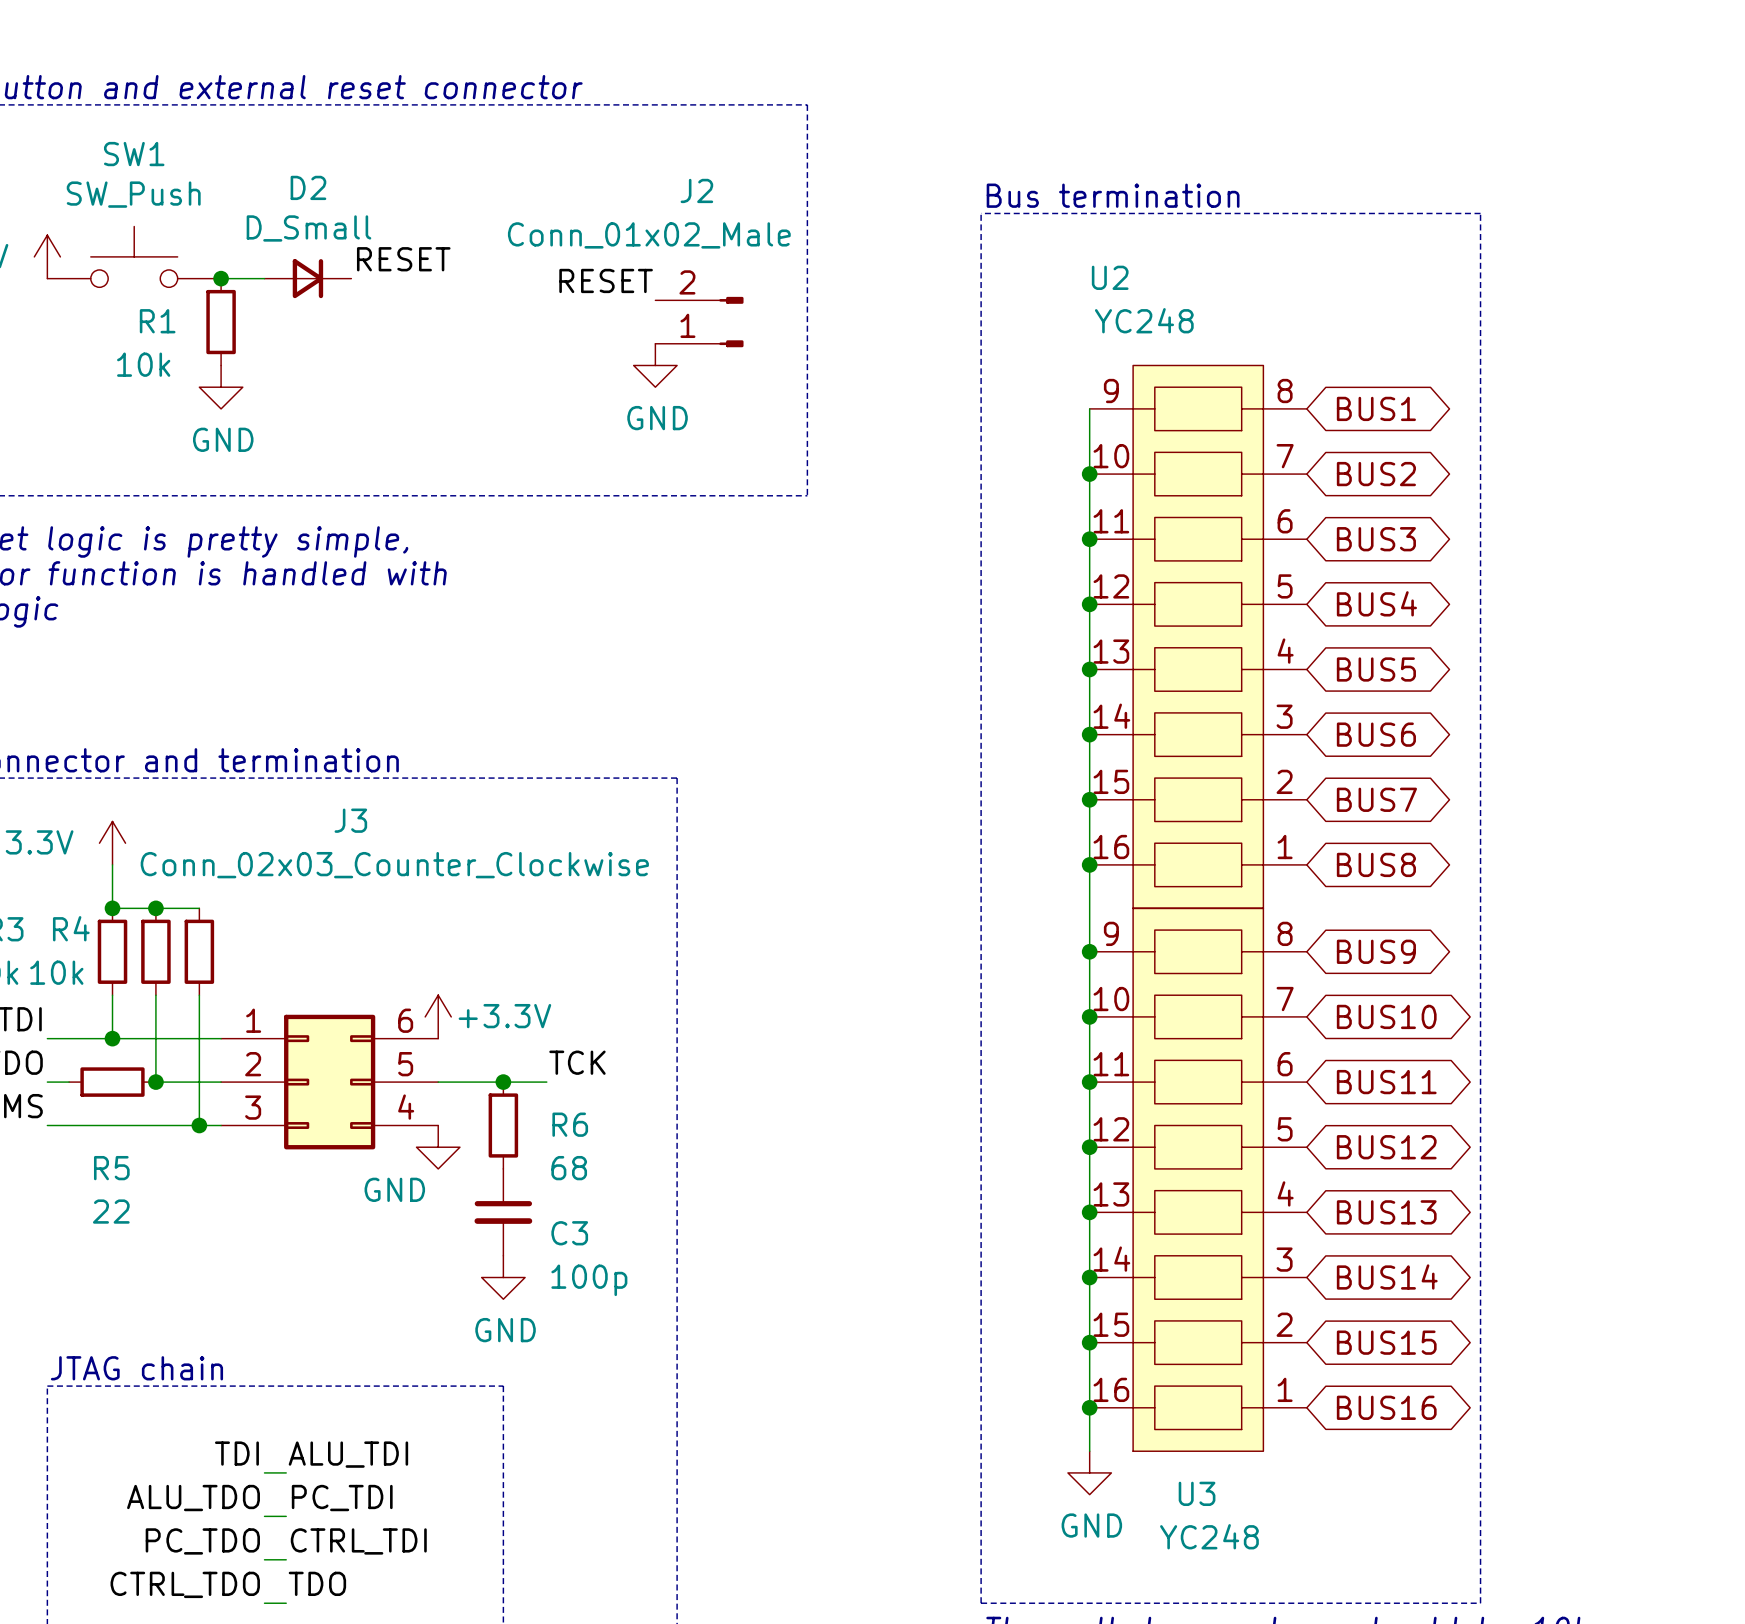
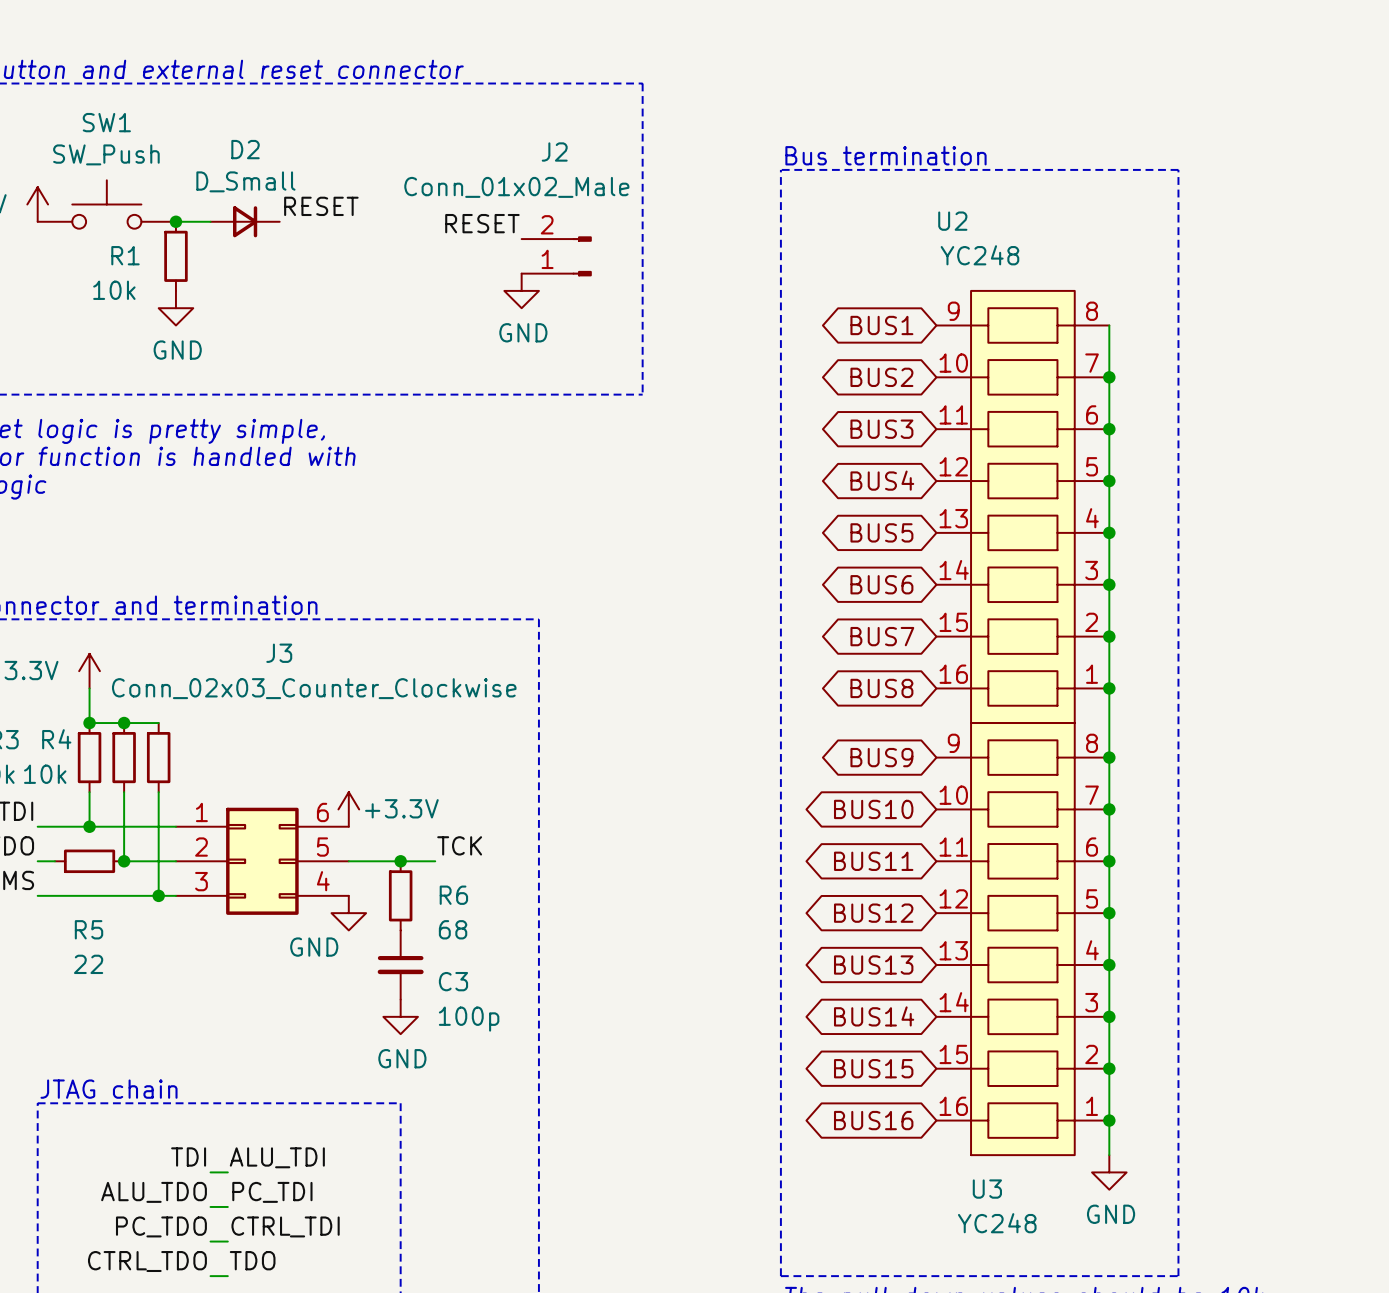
wire: (1089, 408) (1089, 1451) -> (1109, 325) (1109, 1155)
global label rotation: 0° (1376, 408) -> 180° (881, 325)
global label position: BUS1 (1376, 408) -> BUS1 (881, 325)
junction: (1089, 474) -> none
global label rotation: 0° (1376, 474) -> 180° (881, 377)
global label position: BUS2 (1376, 474) -> BUS2 (881, 377)
junction: none -> (1109, 377)
junction: (1089, 539) -> none
global label rotation: 0° (1376, 539) -> 180° (881, 429)
global label position: BUS3 (1376, 539) -> BUS3 (881, 429)
junction: none -> (1109, 429)
global label rotation: 0° (1376, 603) -> 180° (882, 480)
global label position: BUS4 (1376, 603) -> BUS4 (882, 480)
junction: (1089, 604) -> none
junction: none -> (1109, 481)
U2 position: (1198, 636) -> (1022, 506)
junction: (1089, 669) -> none
global label rotation: 0° (1376, 669) -> 180° (881, 532)
global label position: BUS5 (1376, 669) -> BUS5 (881, 532)
junction: none -> (1109, 532)
junction: (1089, 734) -> none
global label rotation: 0° (1376, 734) -> 180° (881, 584)
global label position: BUS6 (1376, 734) -> BUS6 (881, 584)
junction: none -> (1109, 584)
junction: (1089, 799) -> none
global label rotation: 0° (1376, 799) -> 180° (882, 636)
global label position: BUS7 (1376, 799) -> BUS7 (882, 636)
junction: none -> (1109, 636)
junction: (1089, 864) -> none
global label rotation: 0° (1376, 864) -> 180° (881, 688)
global label position: BUS8 (1376, 864) -> BUS8 (881, 688)
junction: none -> (1109, 688)
junction: (1089, 951) -> none
global label rotation: 0° (1376, 951) -> 180° (881, 757)
global label position: BUS9 (1376, 951) -> BUS9 (881, 757)
junction: none -> (1109, 757)
junction: (1089, 1016) -> none
global label rotation: 0° (1386, 1016) -> 180° (873, 809)
global label position: BUS10 (1386, 1016) -> BUS10 (873, 809)
junction: none -> (1109, 809)
junction: (1089, 1082) -> none
global label rotation: 0° (1386, 1082) -> 180° (873, 861)
global label position: BUS11 (1386, 1082) -> BUS11 (873, 861)
junction: none -> (1109, 861)
junction: (1089, 1147) -> none
global label rotation: 0° (1386, 1147) -> 180° (873, 913)
global label position: BUS12 (1386, 1147) -> BUS12 (873, 913)
junction: none -> (1109, 913)
U3 position: (1198, 1179) -> (1022, 939)
junction: (1089, 1212) -> none
global label rotation: 0° (1386, 1212) -> 180° (873, 965)
global label position: BUS13 (1386, 1212) -> BUS13 (873, 965)
junction: none -> (1109, 965)
global label rotation: 0° (1387, 1276) -> 180° (874, 1016)
global label position: BUS14 (1387, 1276) -> BUS14 (874, 1016)
junction: (1089, 1277) -> none
junction: none -> (1109, 1016)
junction: (1089, 1342) -> none
global label rotation: 0° (1386, 1342) -> 180° (873, 1068)
global label position: BUS15 (1386, 1342) -> BUS15 (873, 1068)
junction: none -> (1109, 1068)
junction: (1089, 1407) -> none
global label rotation: 0° (1386, 1407) -> 180° (873, 1120)
global label position: BUS16 (1386, 1407) -> BUS16 (873, 1120)
junction: none -> (1109, 1120)
power symbol position: GND (1089, 1472) -> GND (1109, 1172)
U3 name position: U3 (1197, 1493) -> U3 (987, 1189)
U3 value position: YC248 (1209, 1536) -> YC248 (997, 1223)

